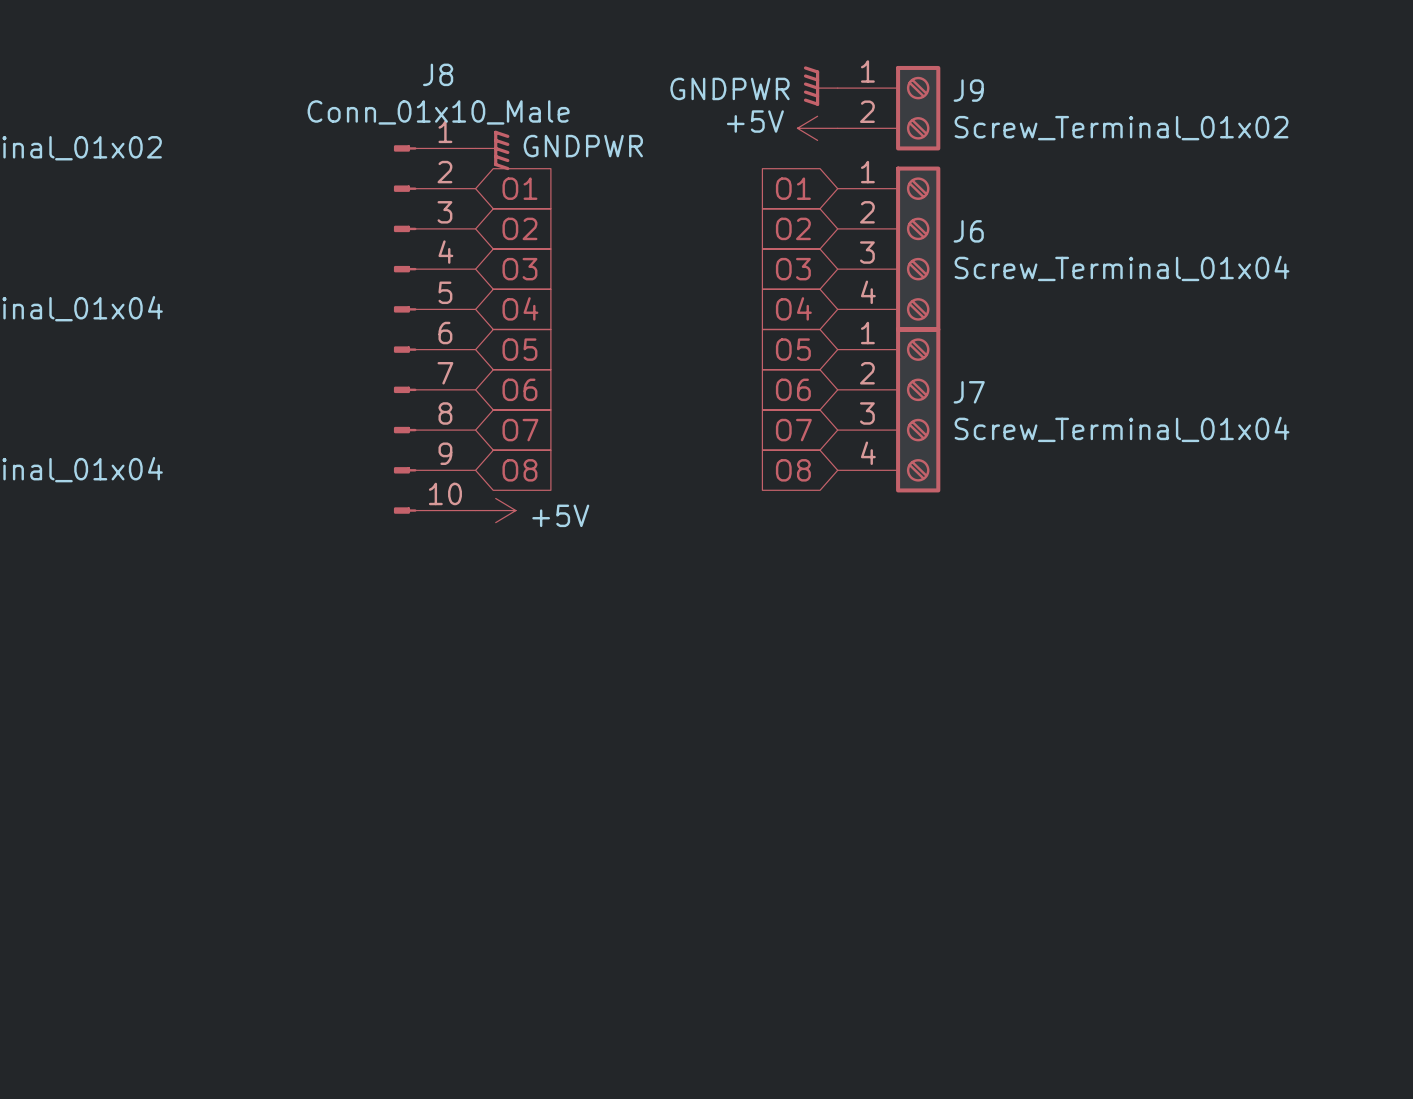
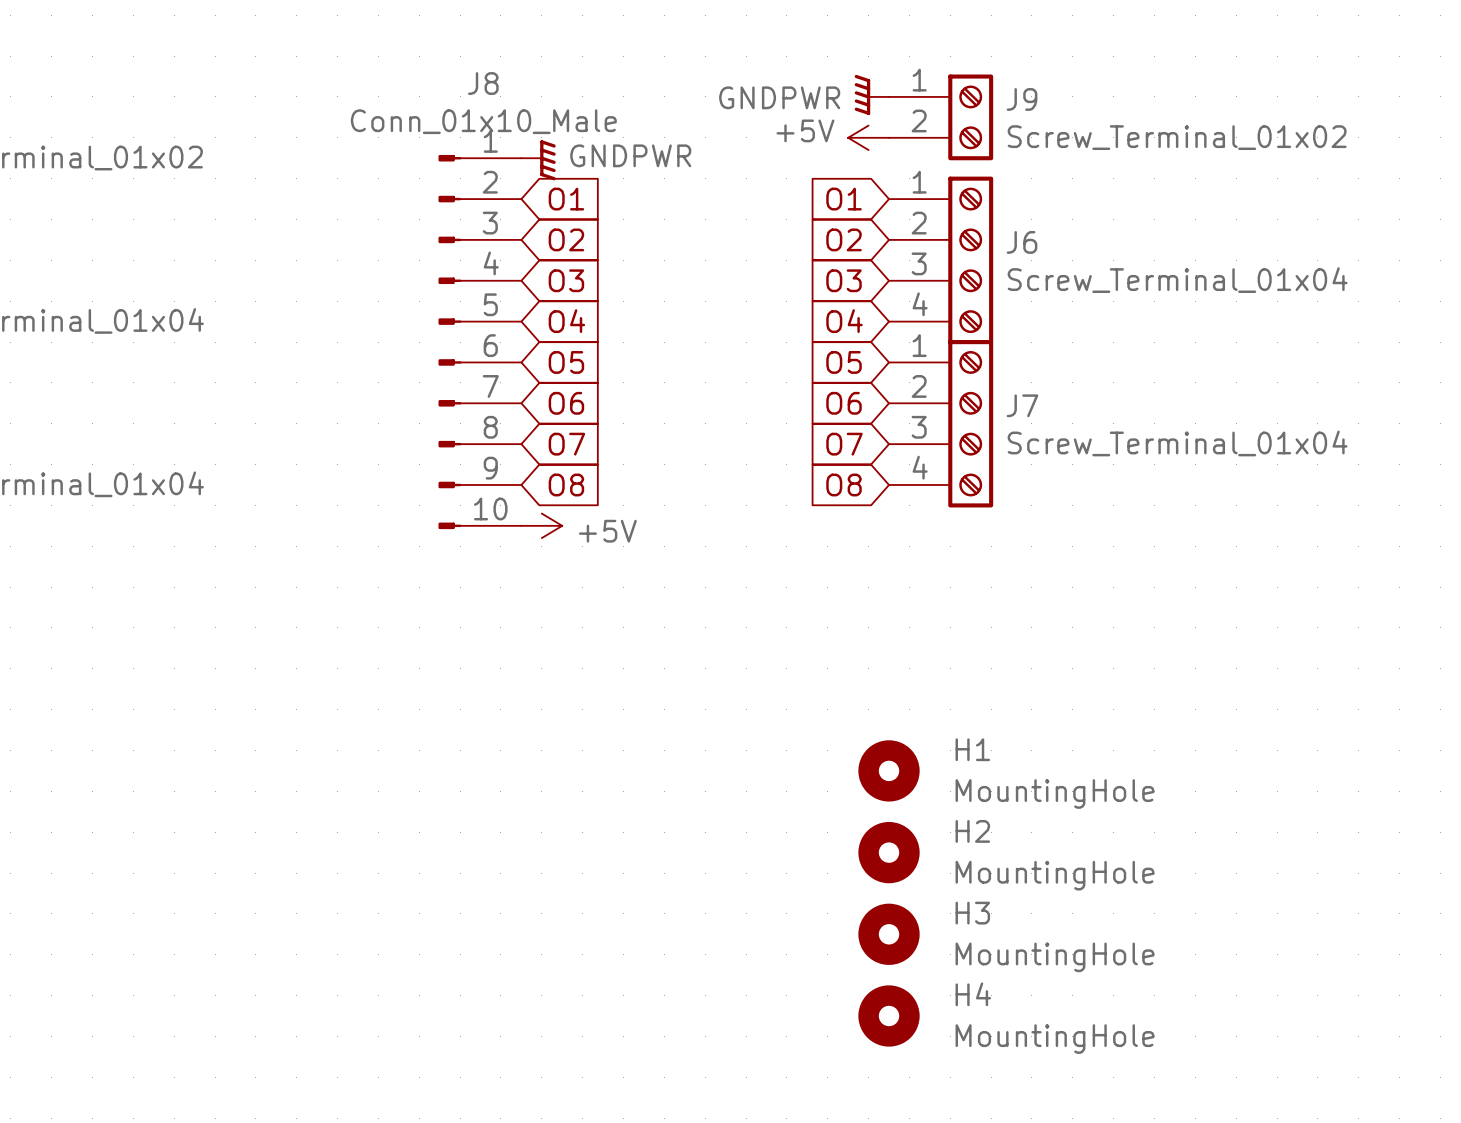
H1: none -> MountingHole (889, 770)
H2: none -> MountingHole (889, 852)
H3: none -> MountingHole (889, 934)
H4: none -> MountingHole (889, 1015)

